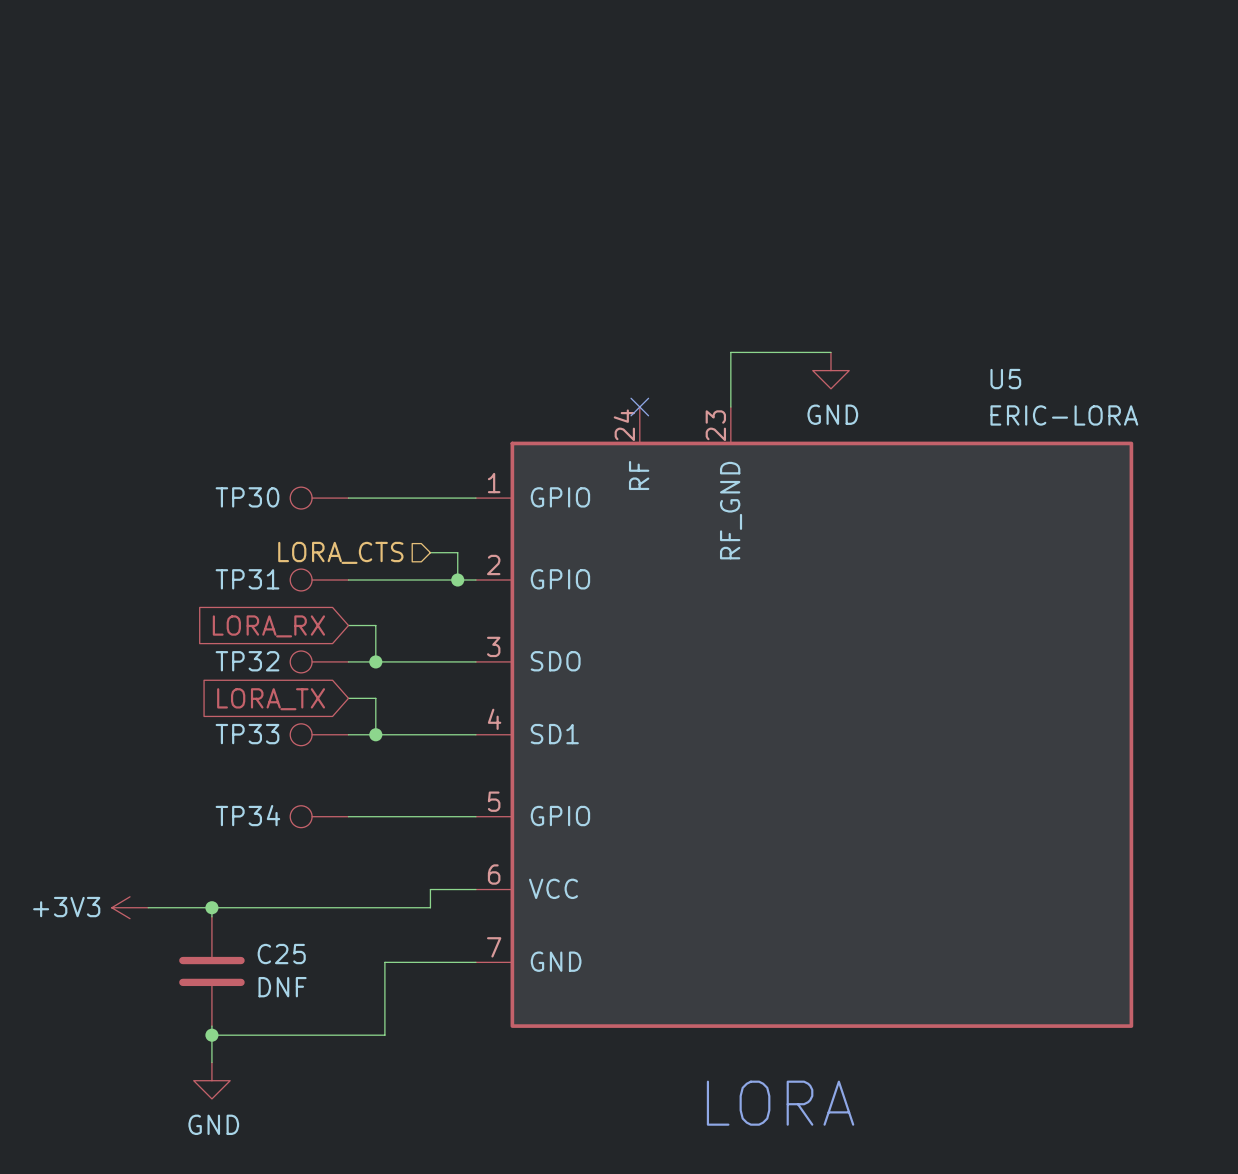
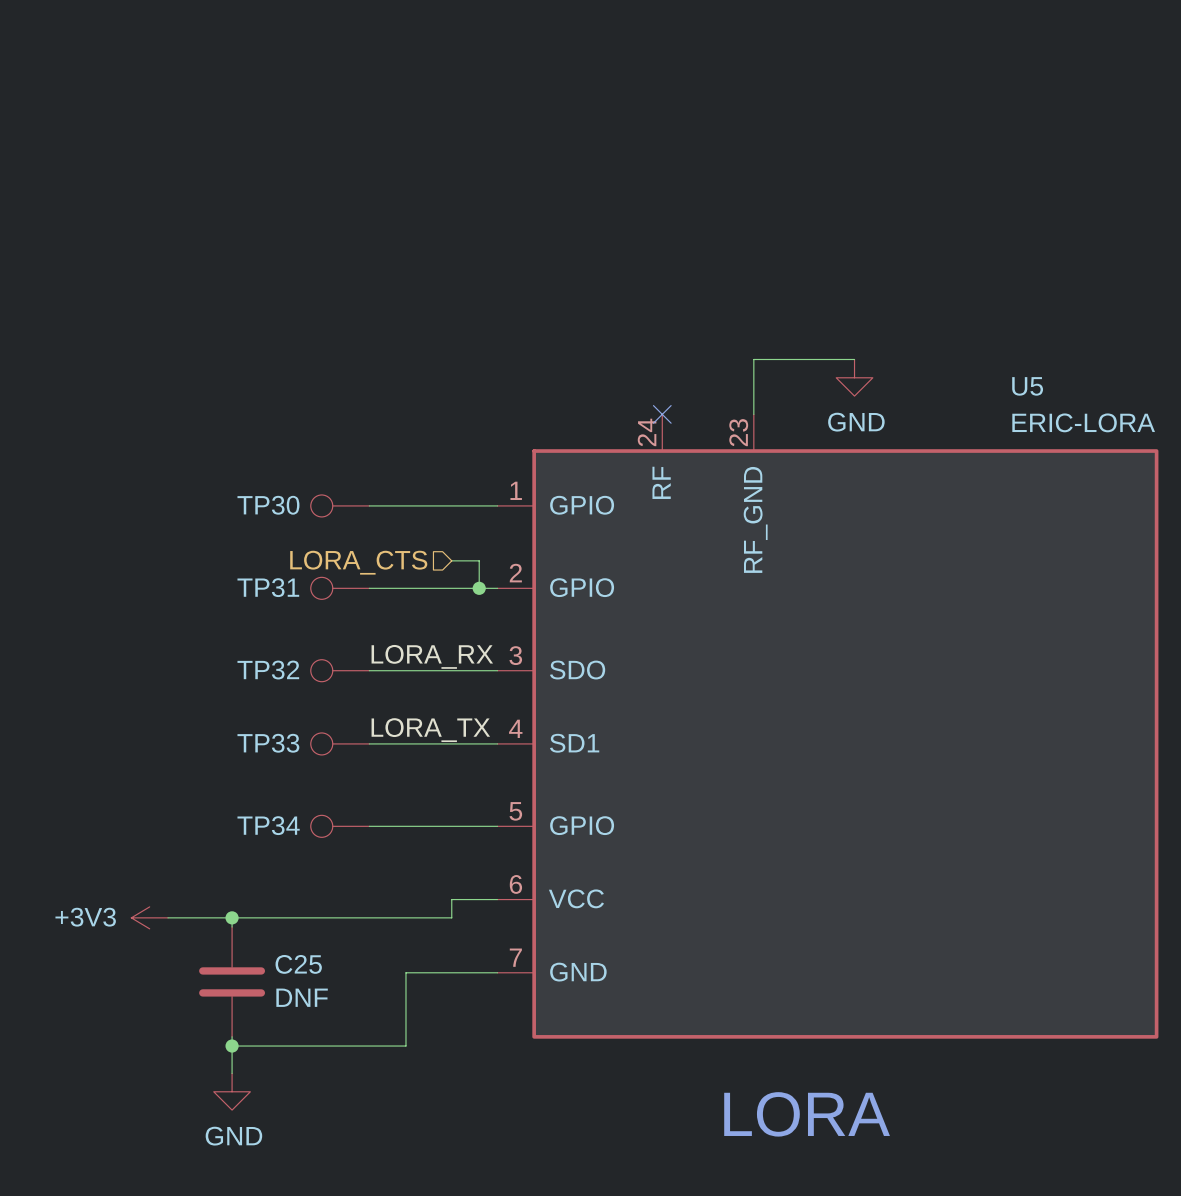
wire: (348, 625) (375, 625) (375, 661) -> none
global label: LORA_RX (268, 626) -> none
label: none -> LORA_RX (432, 656)
junction: (375, 661) -> none
wire: (348, 698) (375, 698) (375, 734) -> none
global label: LORA_TX (271, 699) -> none
label: none -> LORA_TX (430, 730)
junction: (375, 734) -> none

